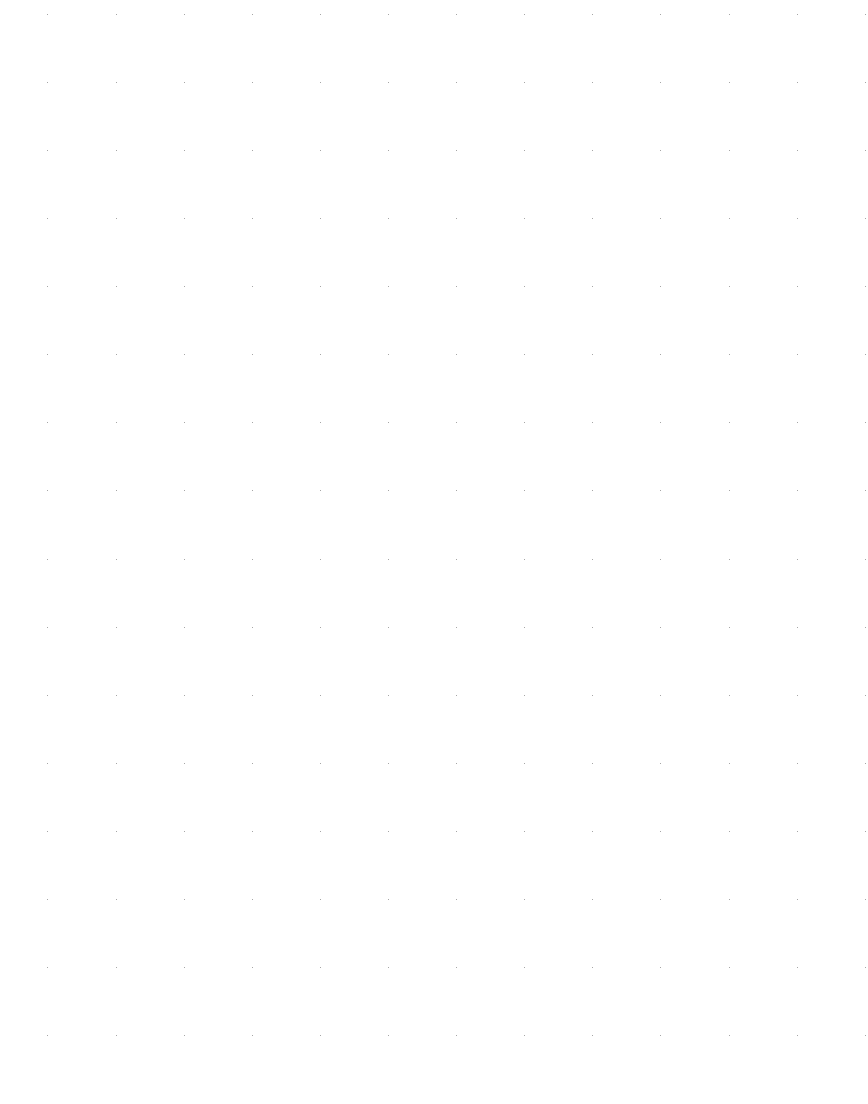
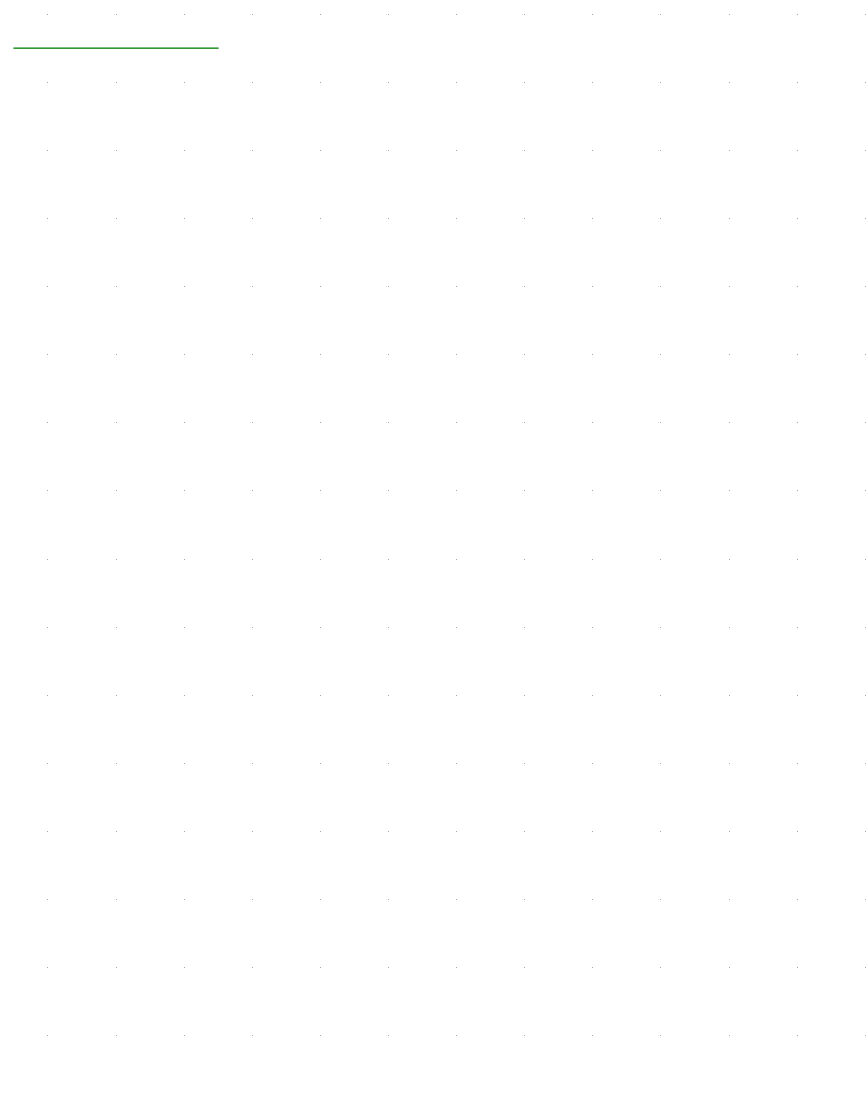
wire: none -> (13, 48) (218, 48)

